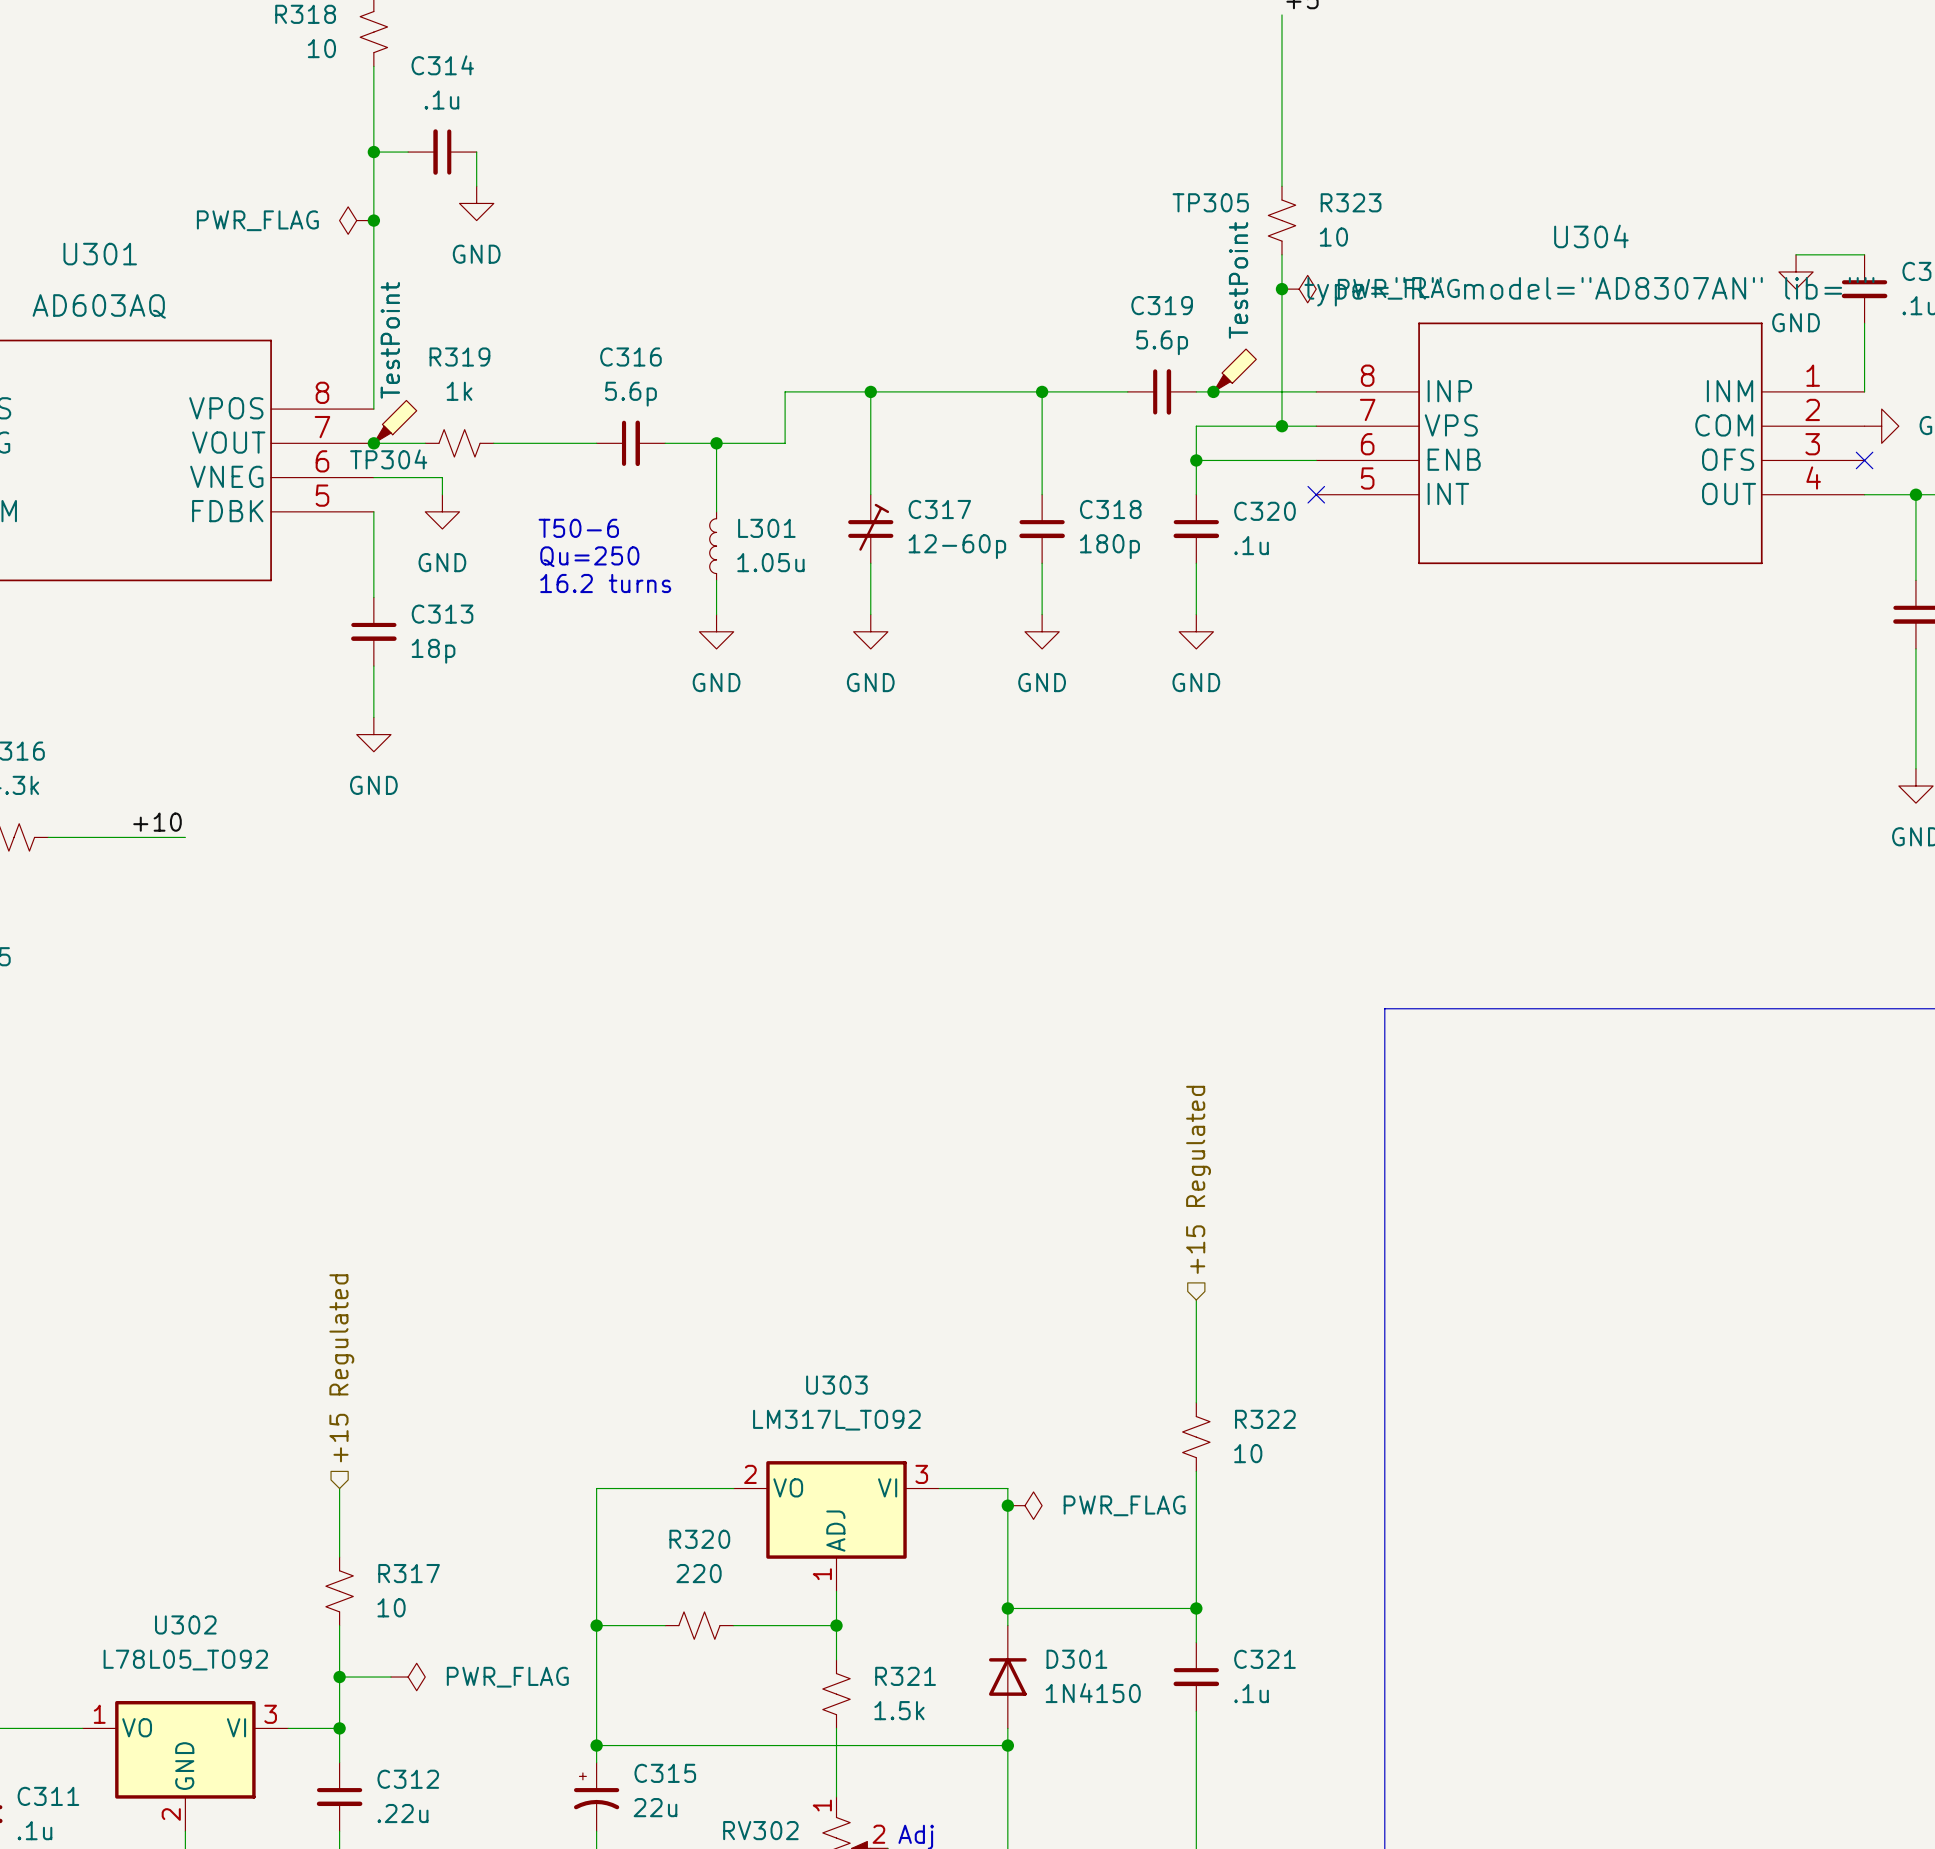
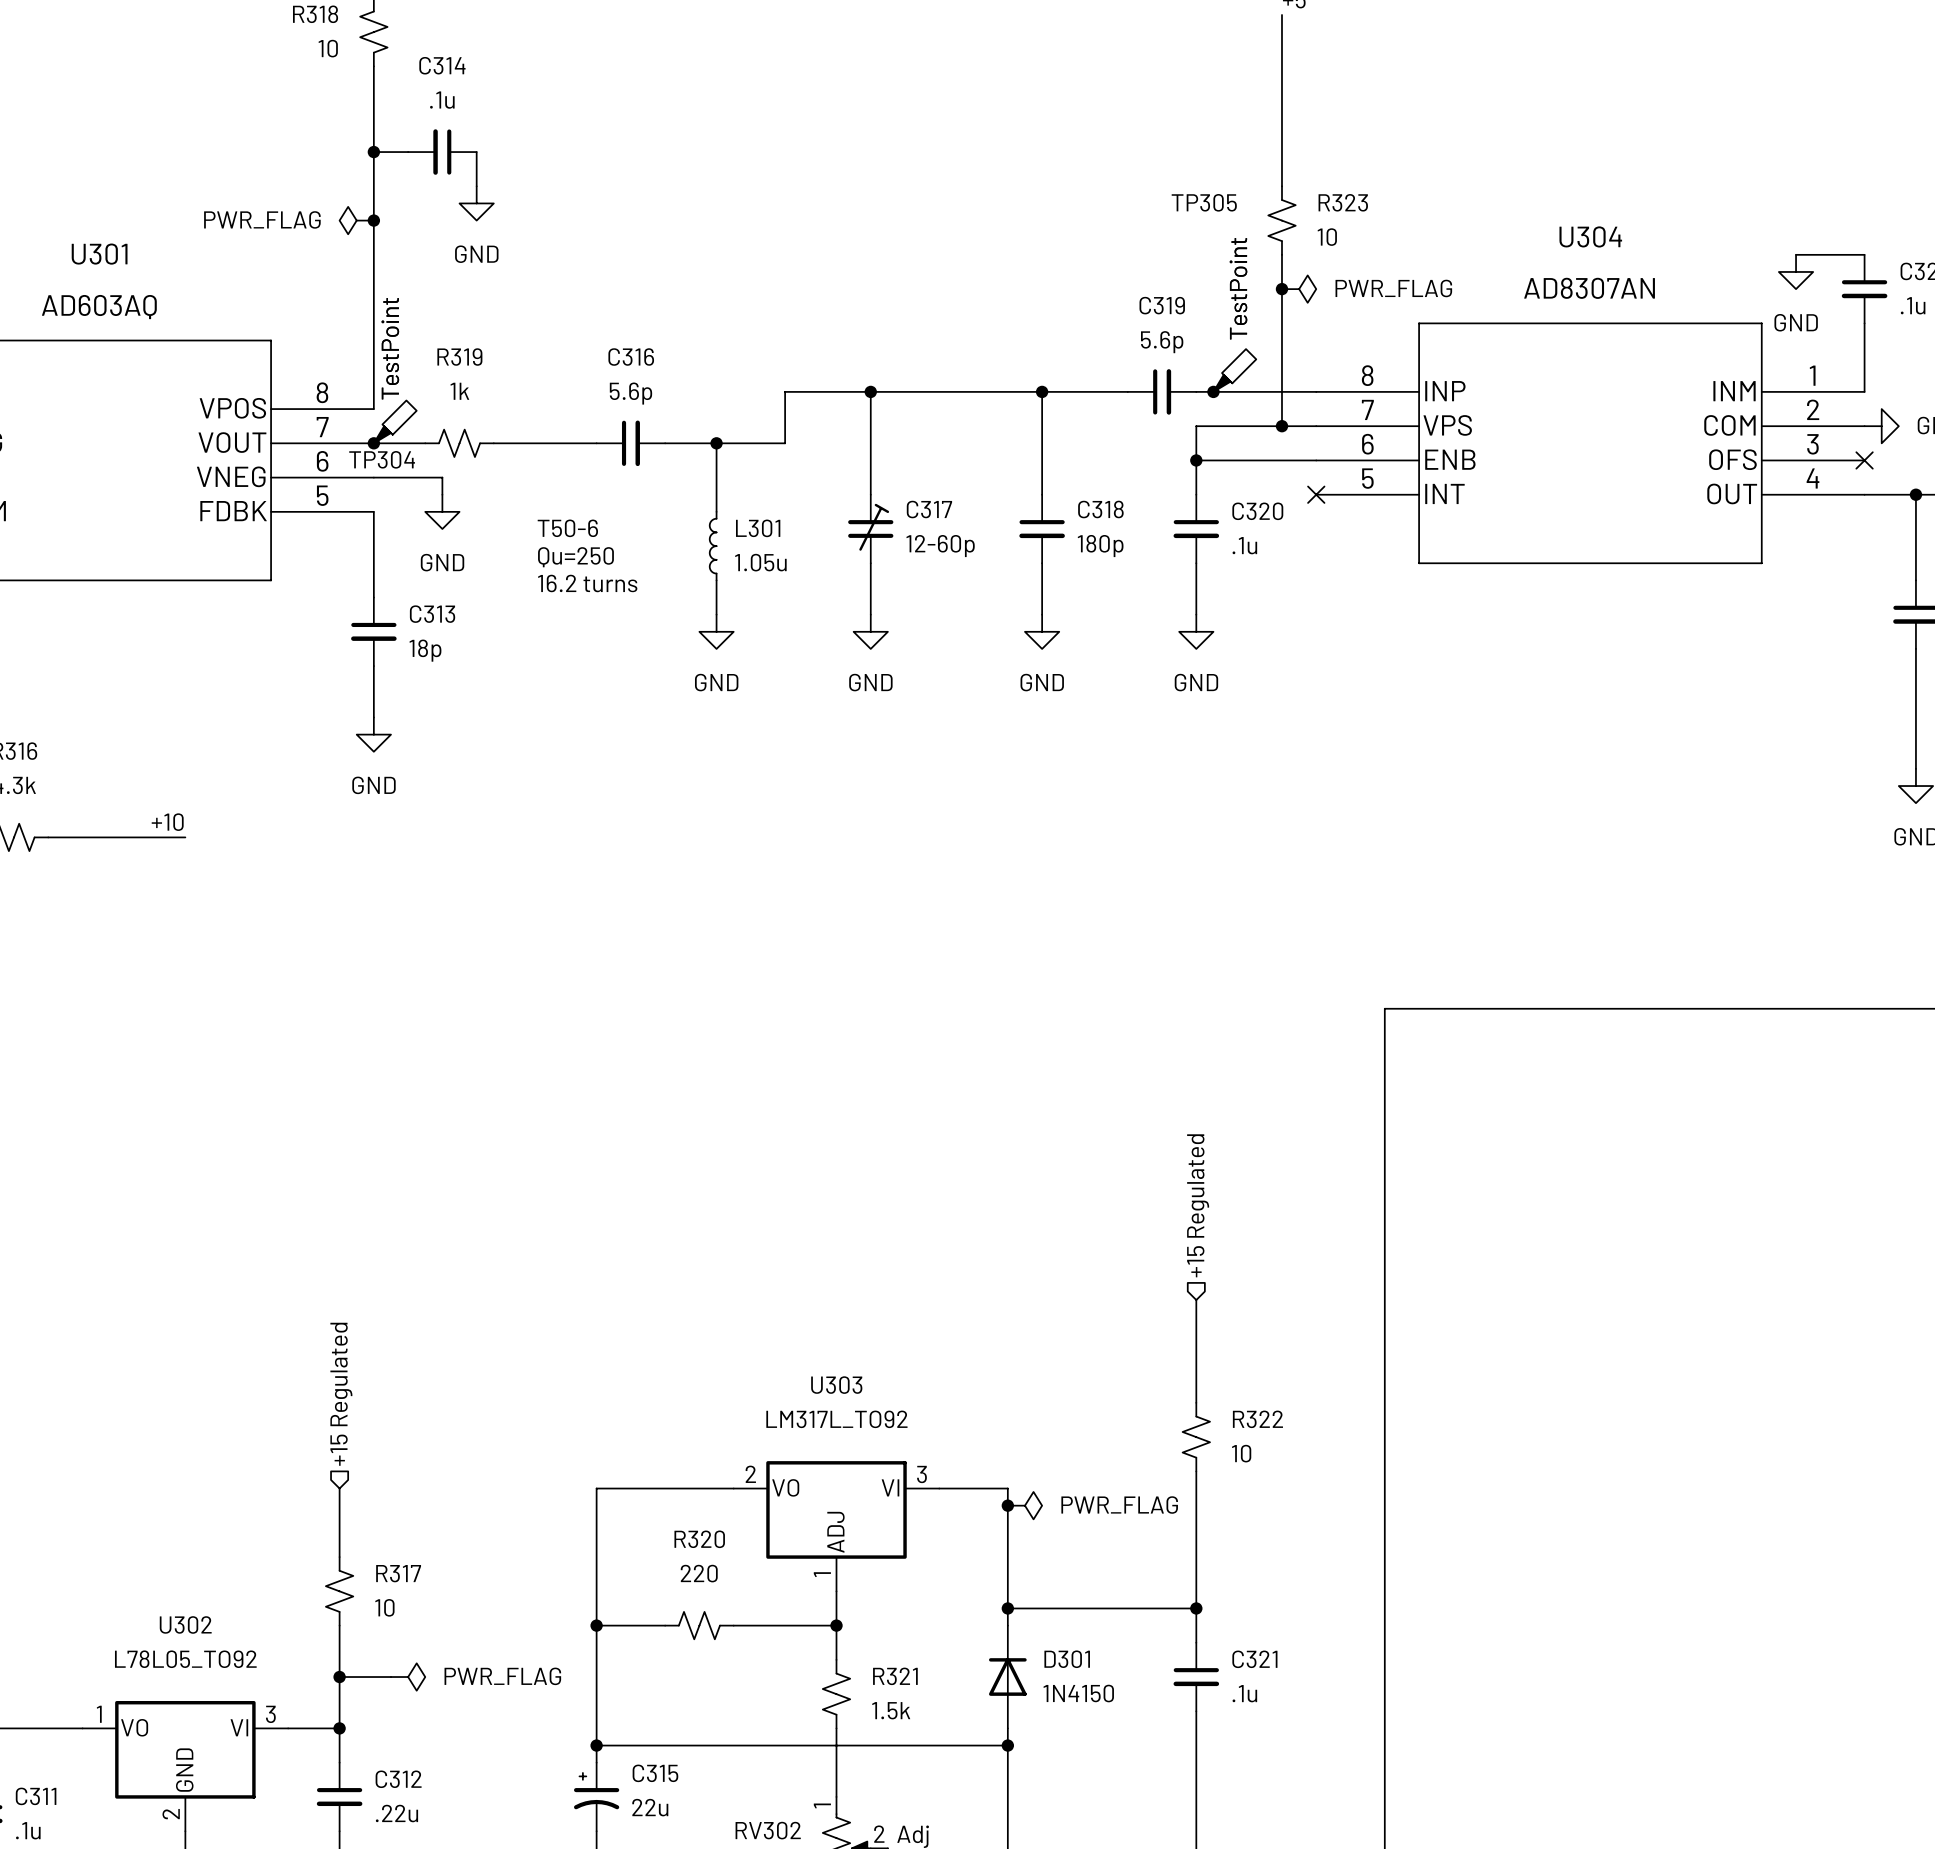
U304 value: type="R" model="AD8307AN" lib="" (1589, 291) -> AD8307AN (1589, 288)

